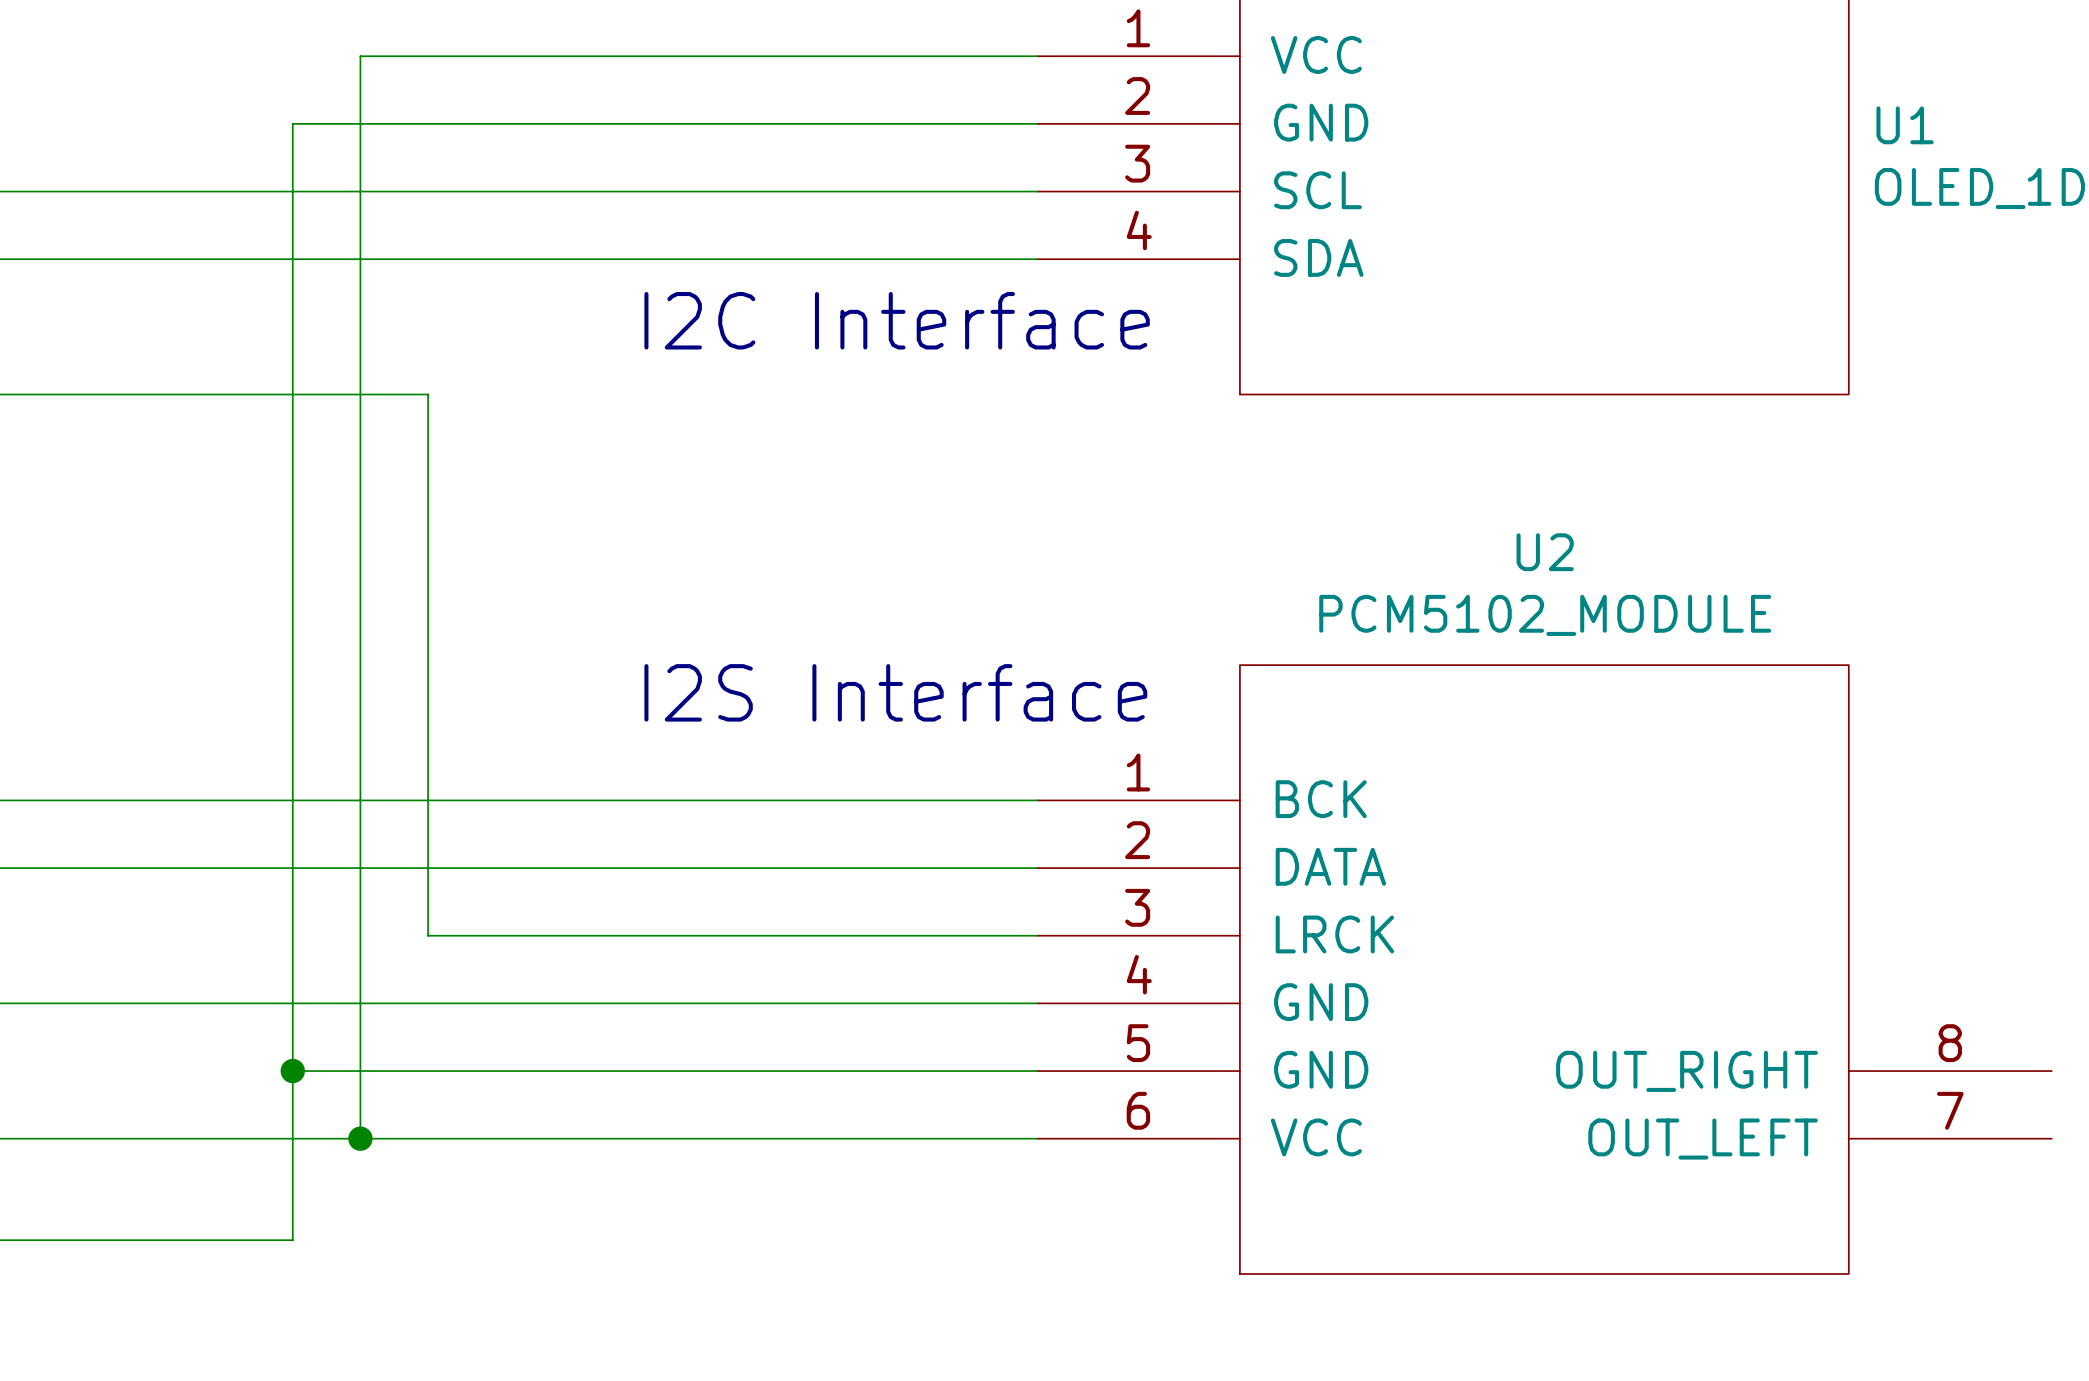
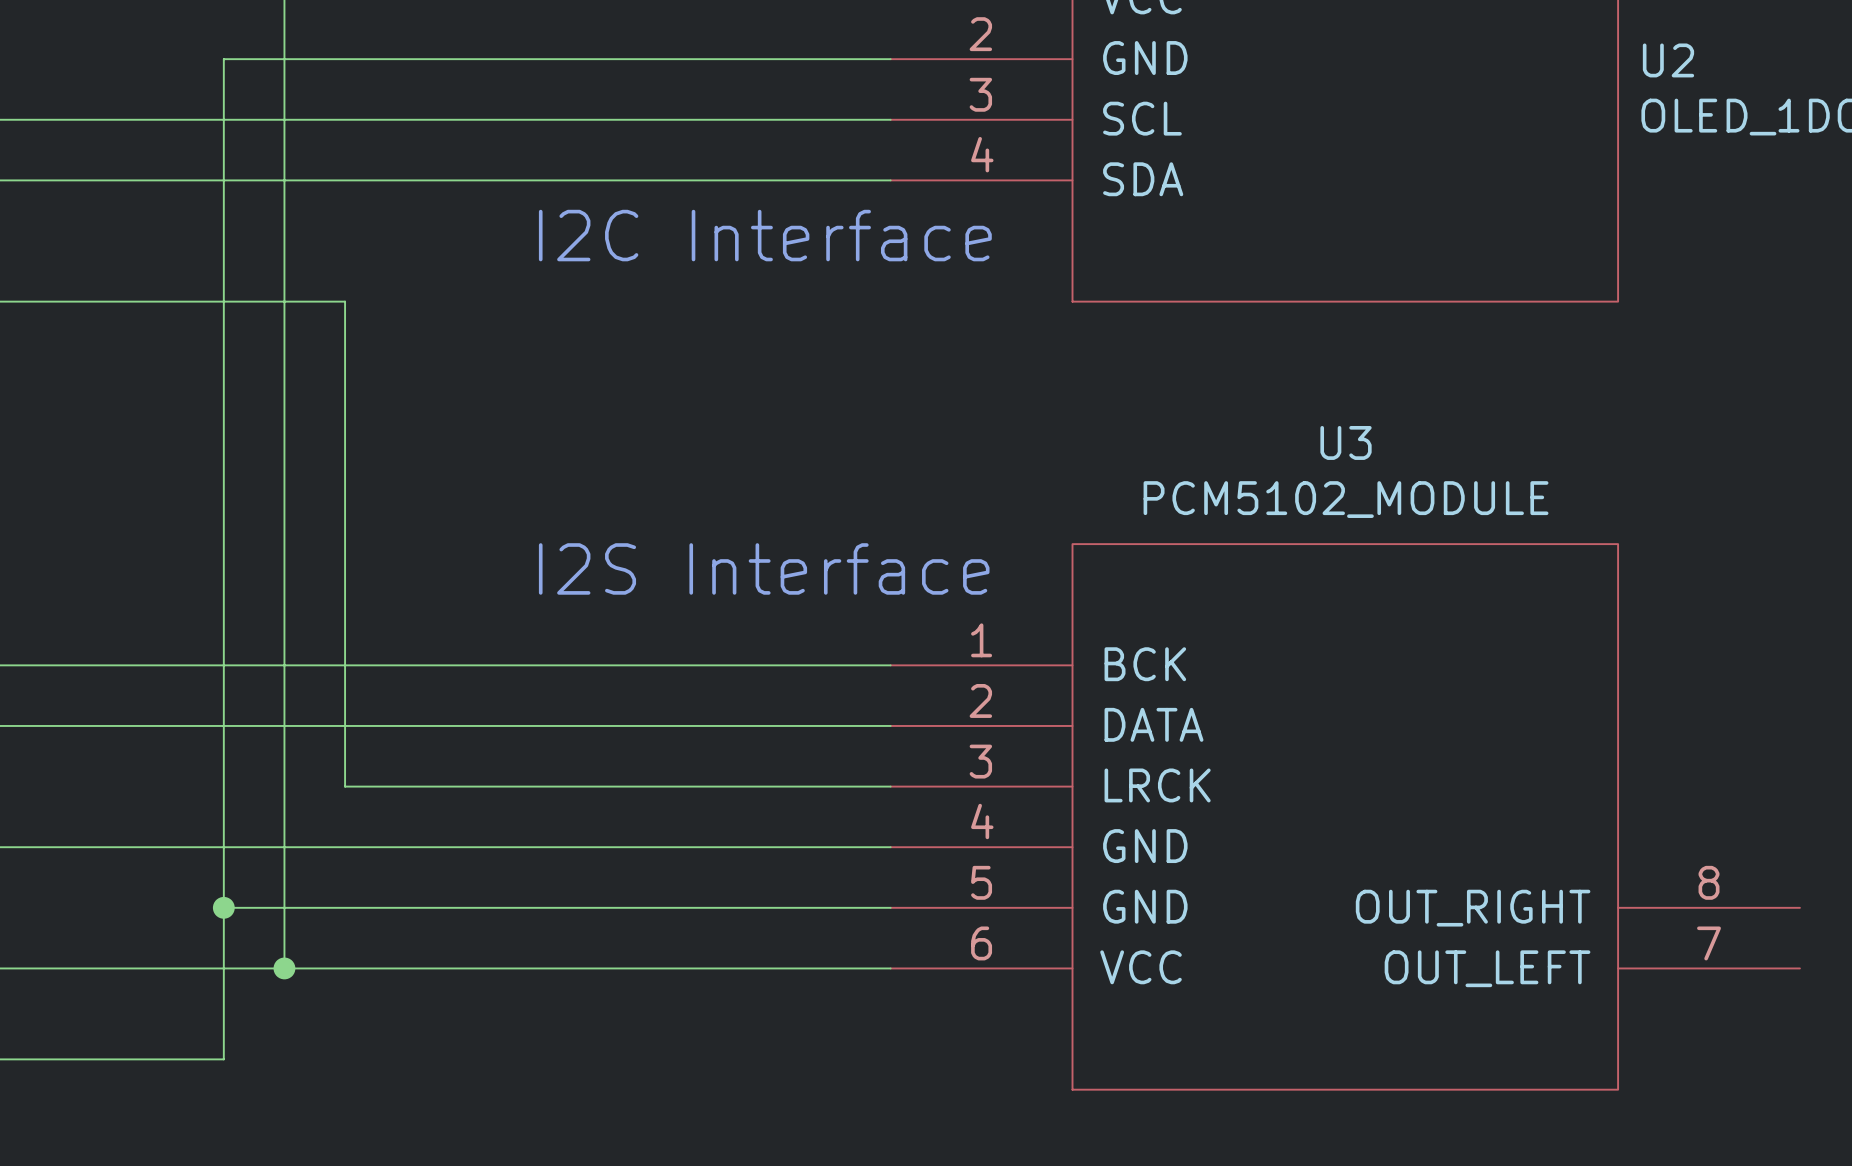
U1 name: U1 (1905, 125) -> U2 (1668, 60)
U2 name: U2 (1545, 552) -> U3 (1346, 442)

